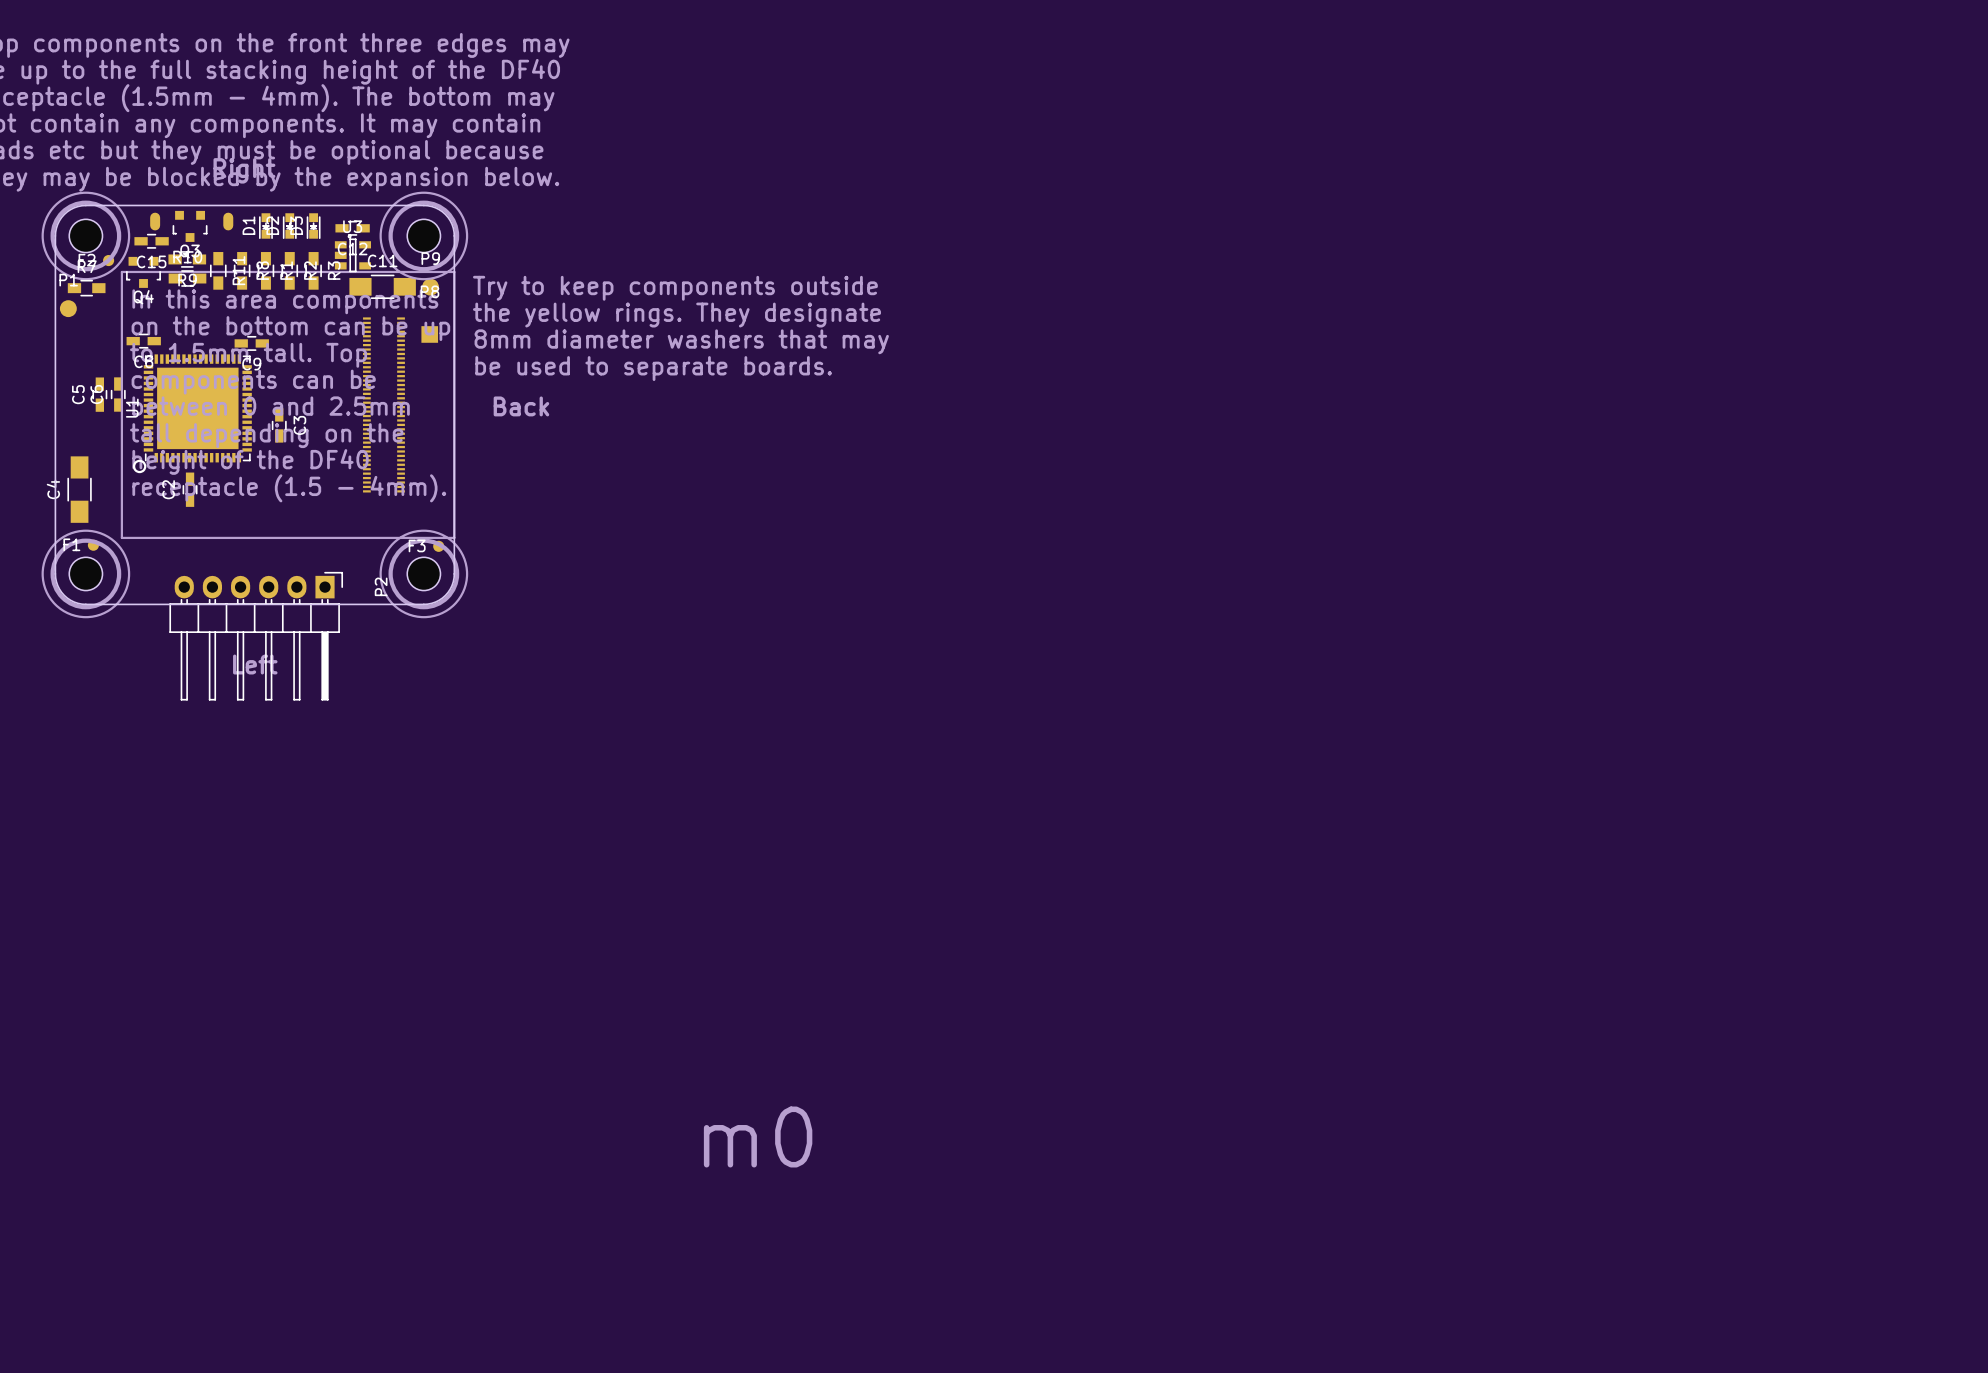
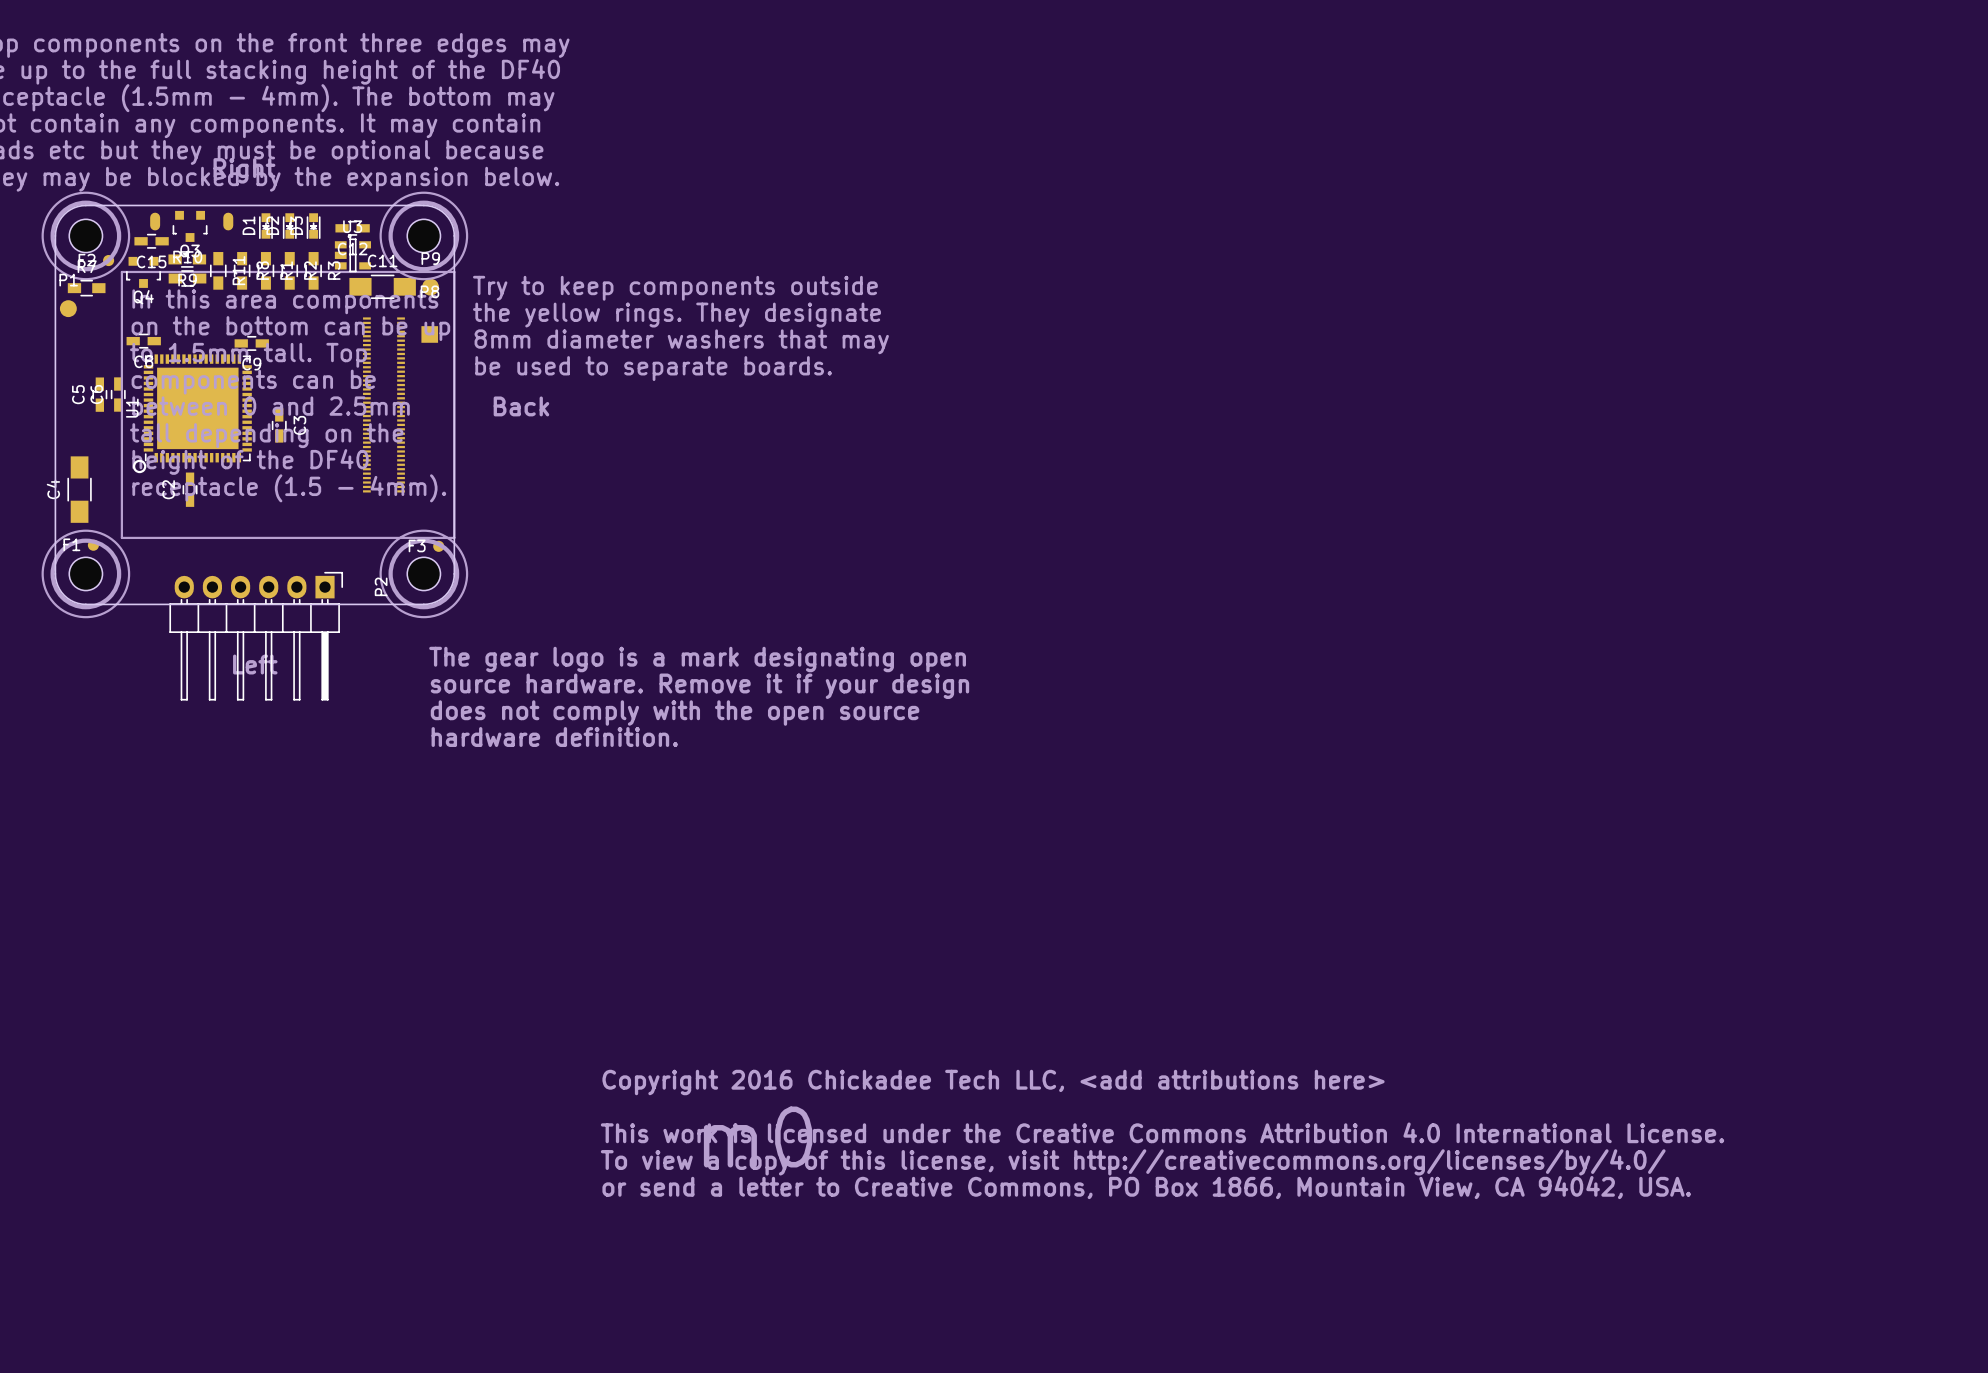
text: none -> The gear logo is a mark designating open (697, 659)
text: none -> source hardware. Remove it if your design (699, 686)
text: none -> does not comply with the open source (675, 713)
text: none -> hardware definition. (554, 737)
text: none -> Copyright 2016 Chickadee Tech LLC, <add attributions here> (993, 1082)
text: none -> This work is licensed under the Creative Commons Attribution 4.0 International License. (1162, 1132)
text: none -> To view a copy of this license, visit http://creativecommons.org/licenses/by/4.0/ (1133, 1162)
text: none -> or send a letter to Creative Commons, PO Box 1866, Mountain View, CA 94042, USA. (1146, 1187)

